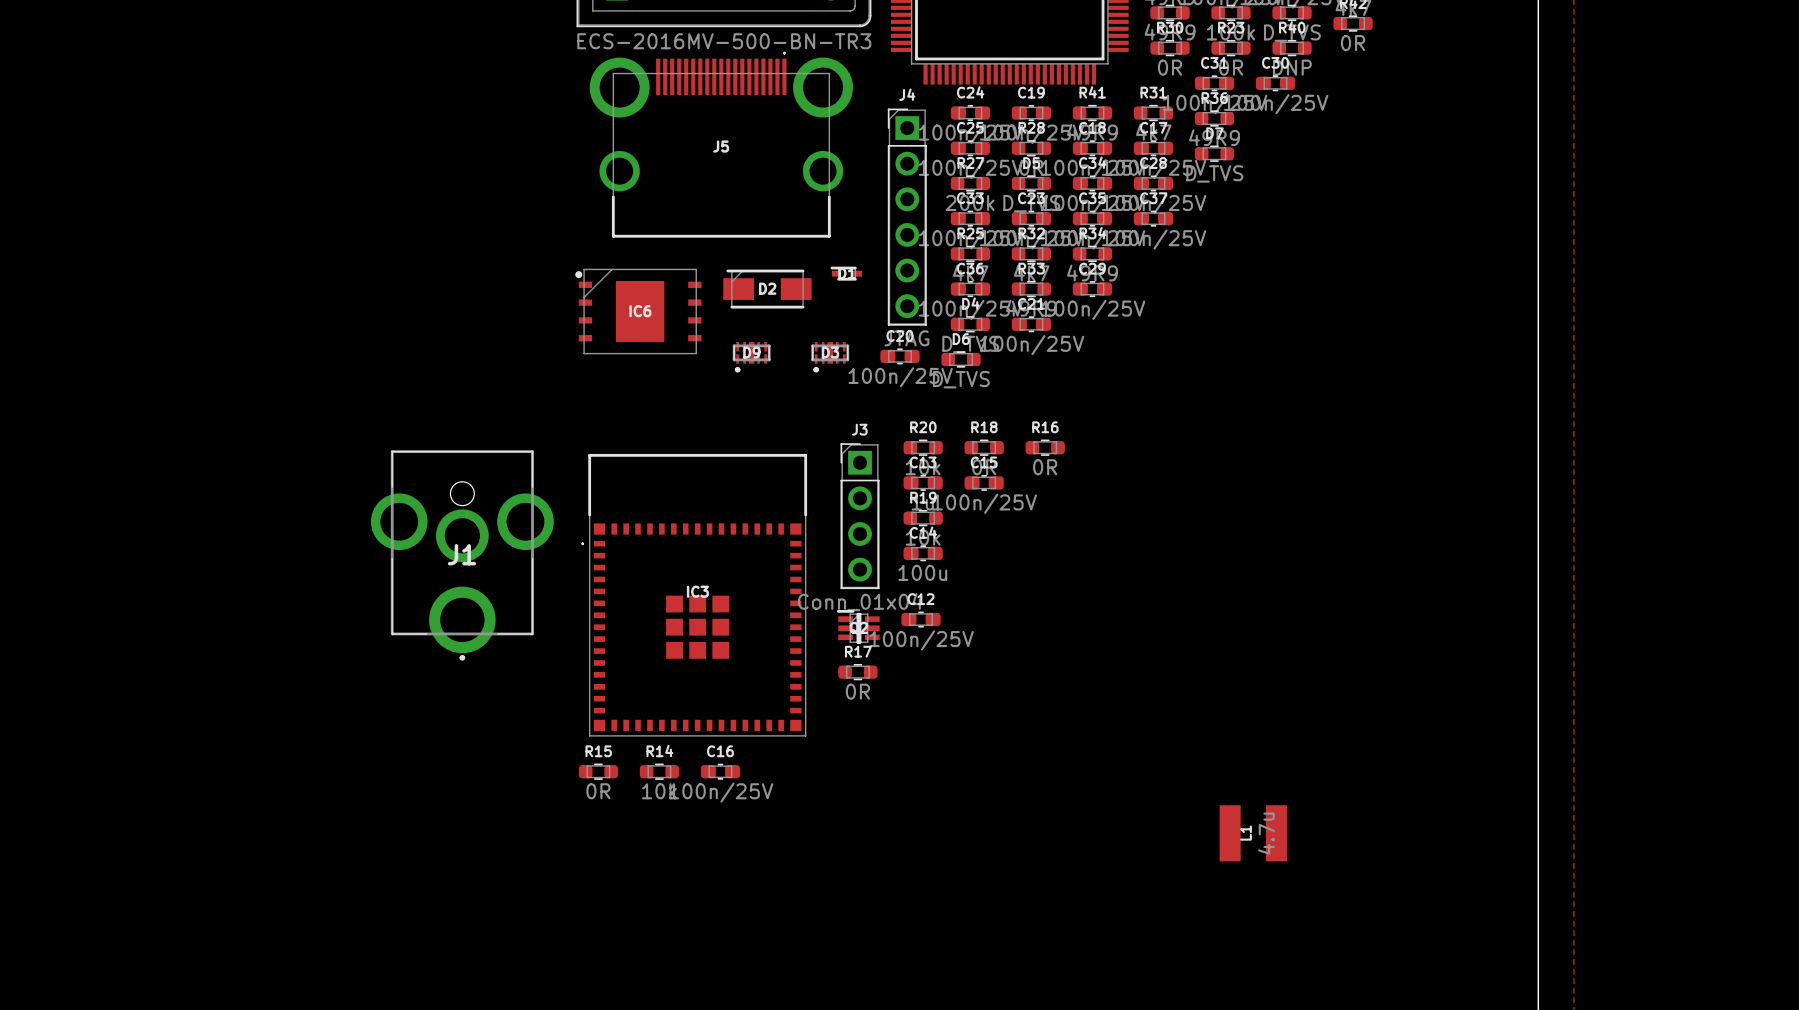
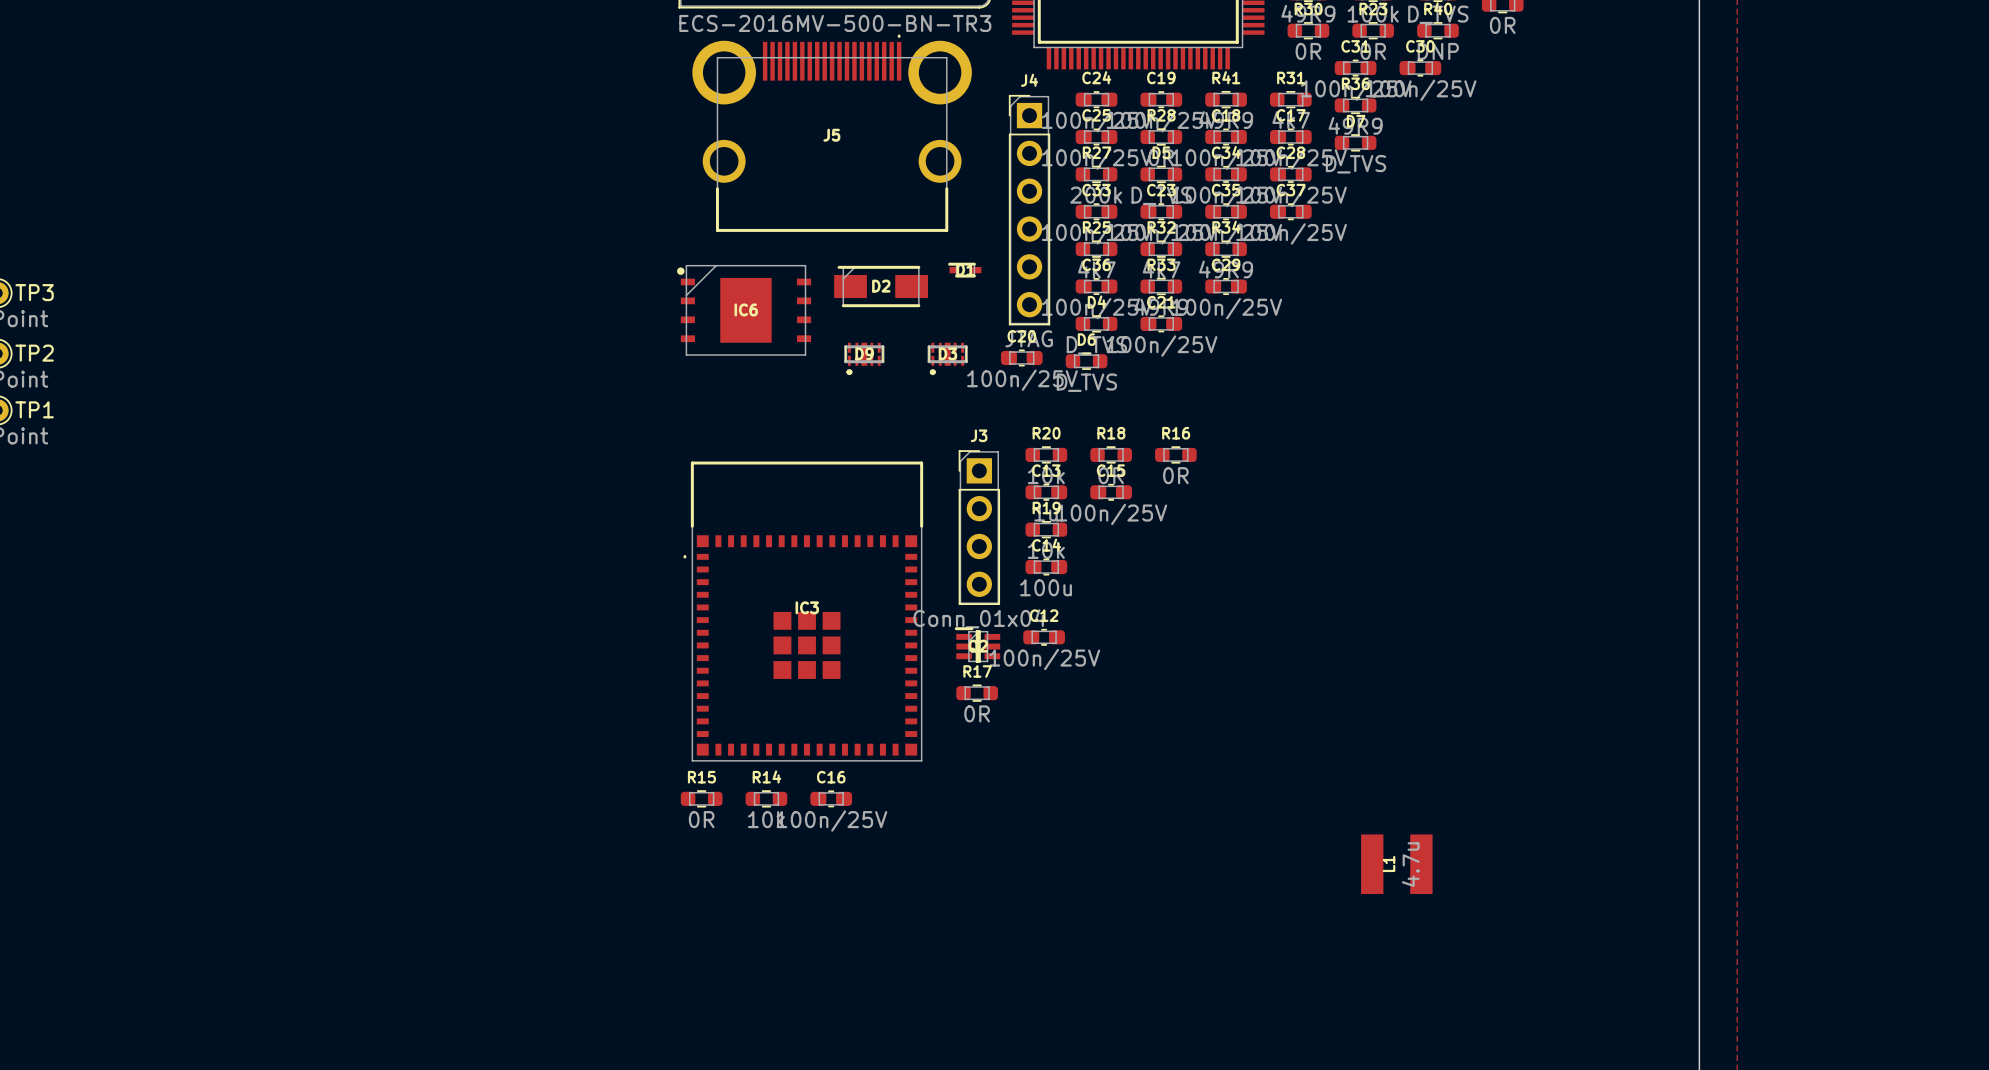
J1: (462, 555) -> none

